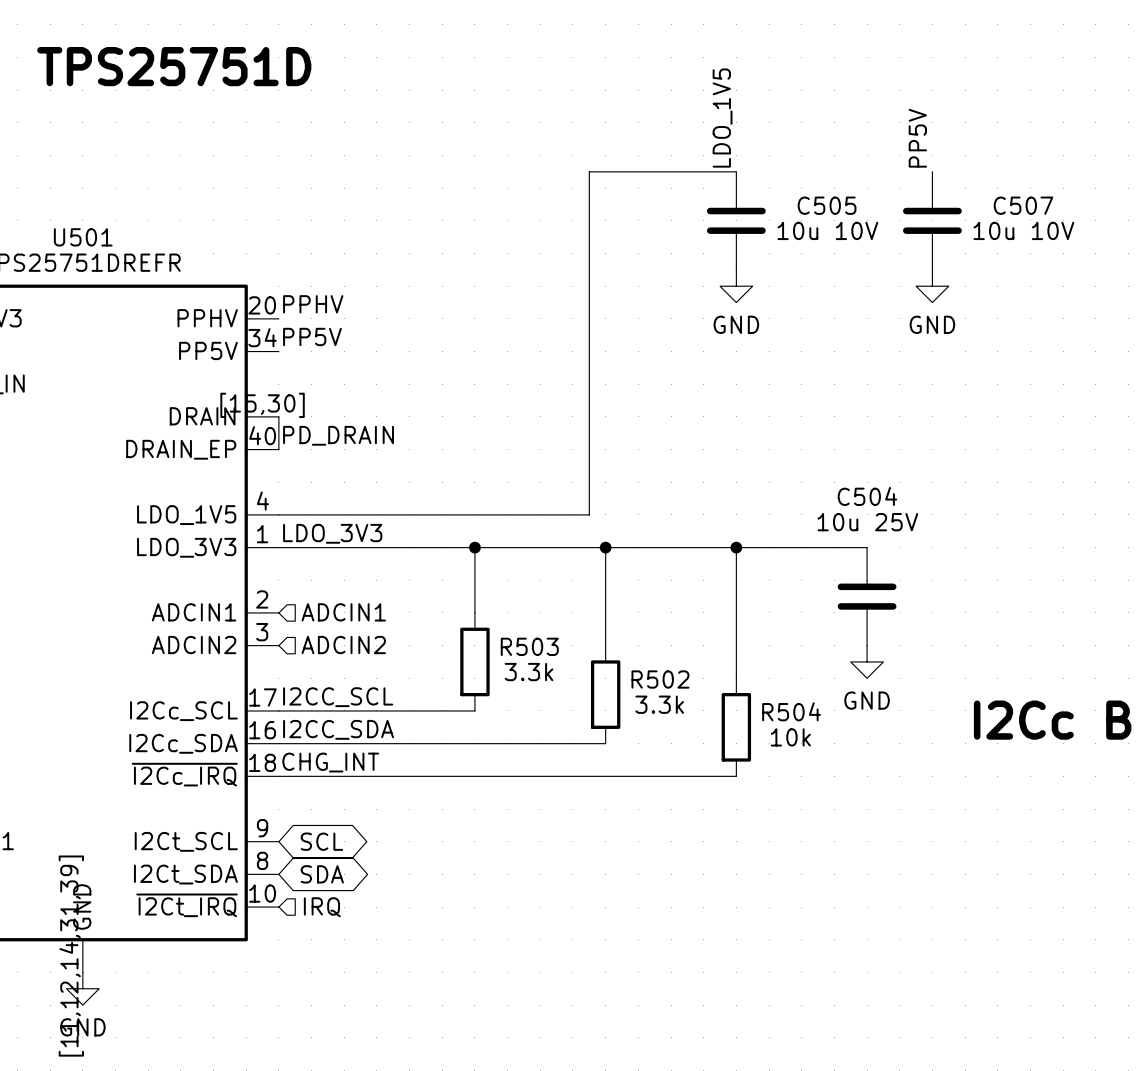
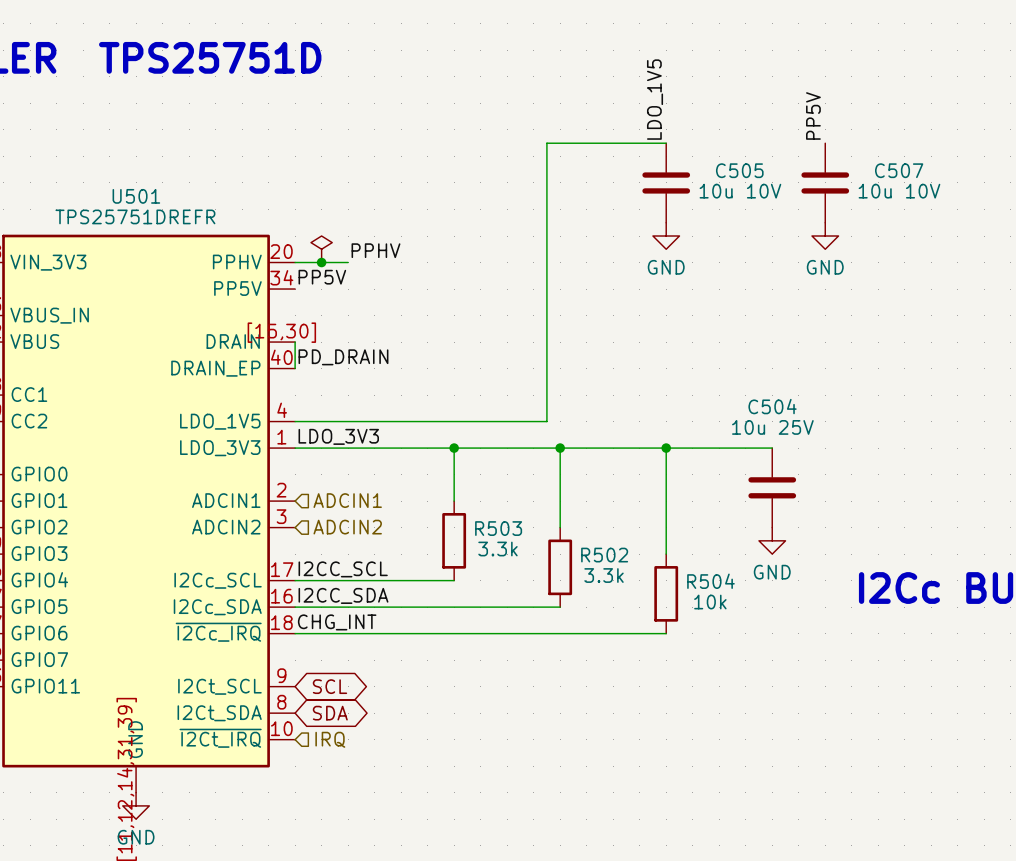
power symbol: none -> (321, 249)
label position: PPHV (313, 304) -> PPHV (375, 250)
wire: none -> (295, 262) (348, 262)
junction: none -> (321, 262)

